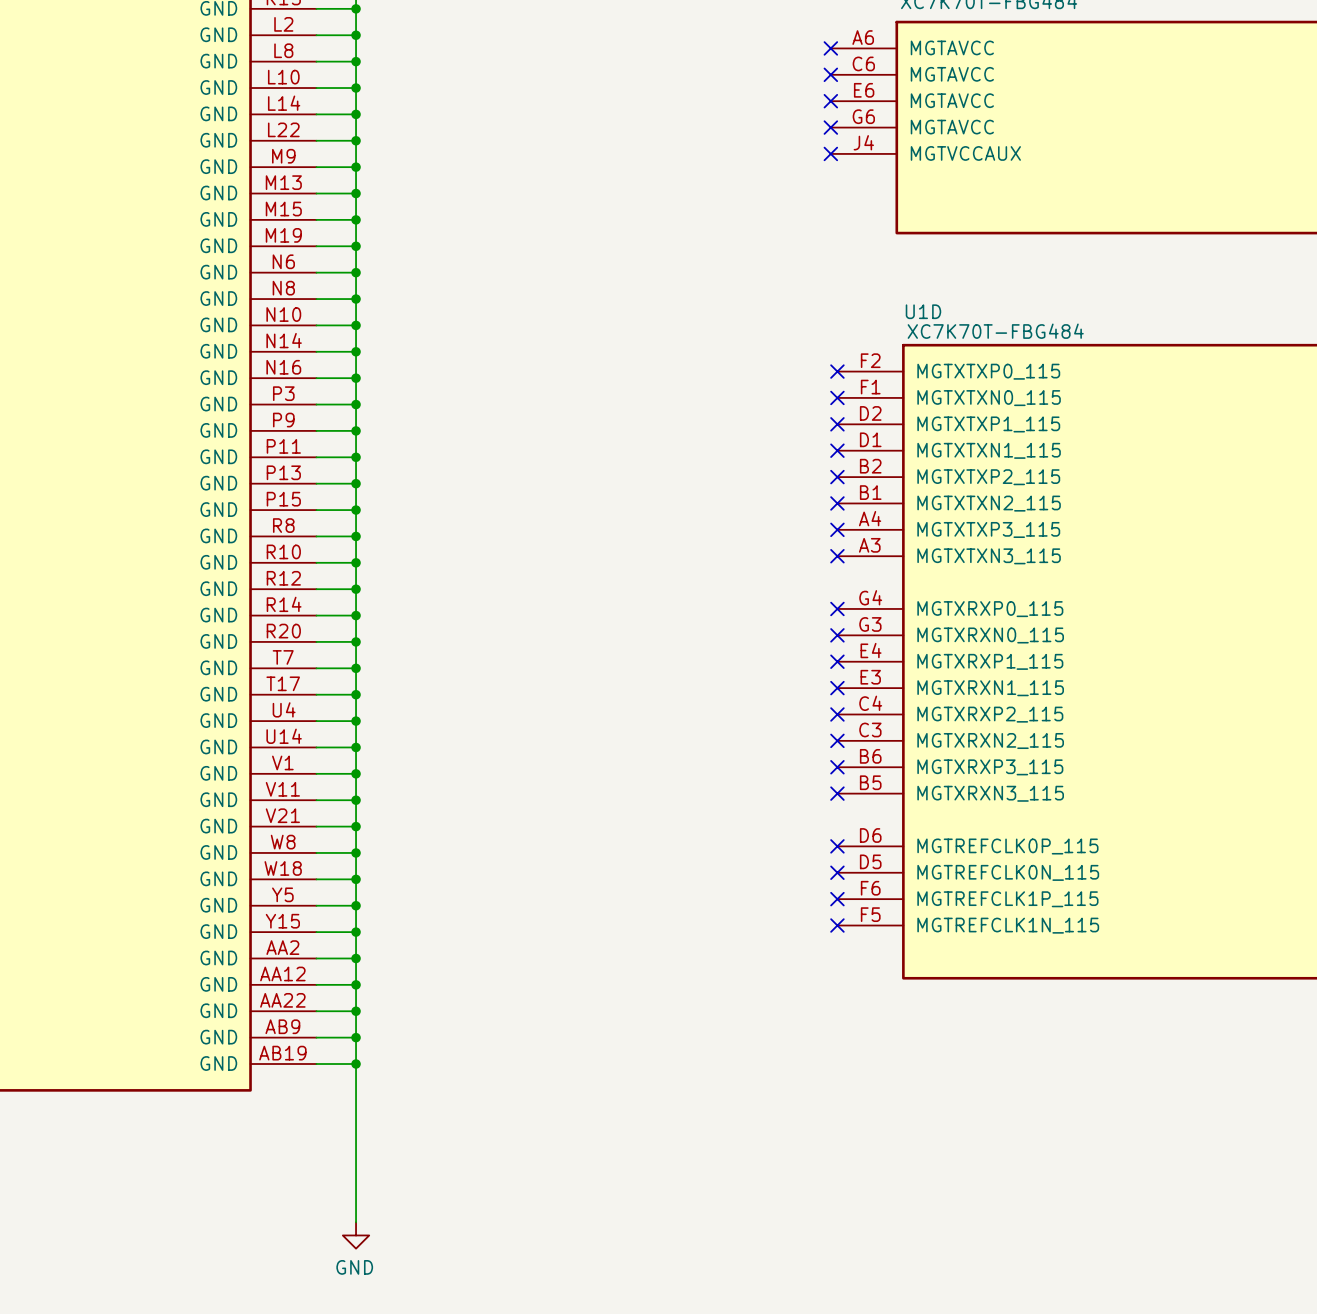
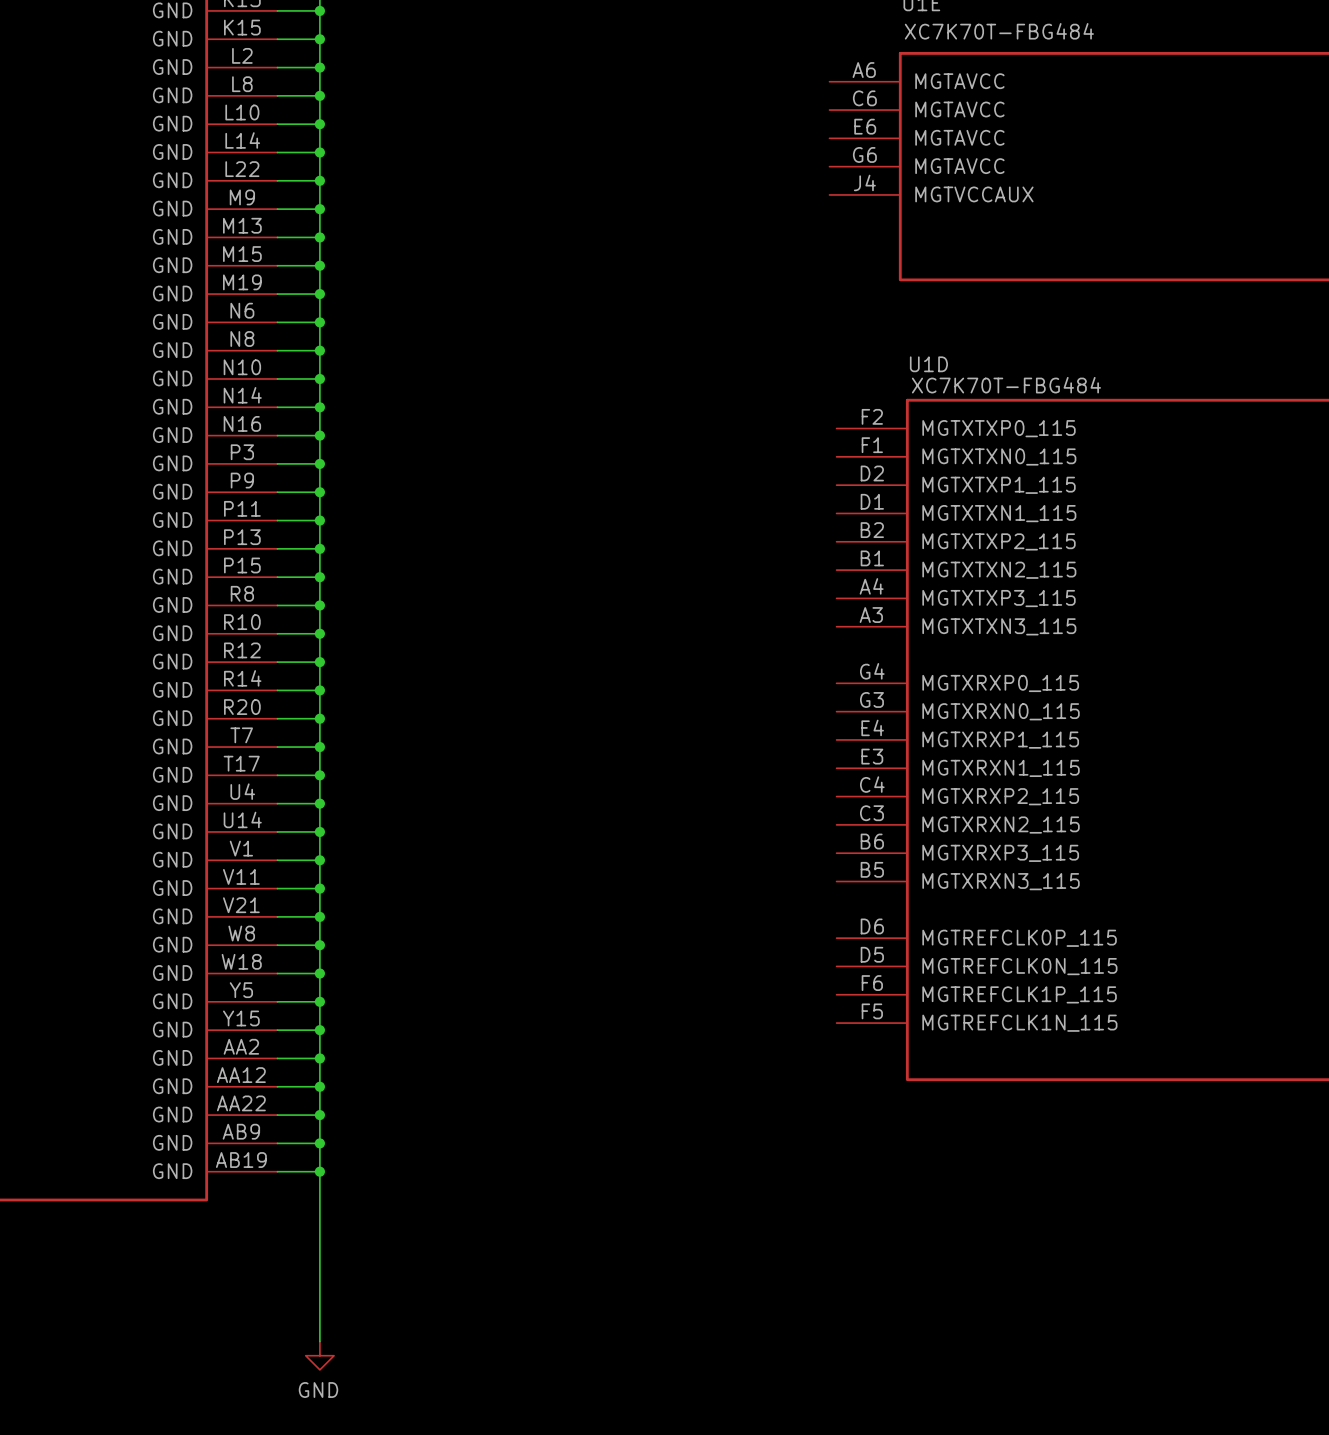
no-connect mark: (830, 48) -> none
no-connect mark: (830, 74) -> none
no-connect mark: (830, 101) -> none
no-connect mark: (830, 127) -> none
no-connect mark: (830, 153) -> none
no-connect mark: (837, 371) -> none
no-connect mark: (837, 397) -> none
no-connect mark: (837, 424) -> none
no-connect mark: (837, 450) -> none
no-connect mark: (837, 477) -> none
no-connect mark: (837, 503) -> none
no-connect mark: (837, 529) -> none
no-connect mark: (837, 556) -> none
no-connect mark: (837, 608) -> none
no-connect mark: (837, 635) -> none
no-connect mark: (837, 661) -> none
no-connect mark: (837, 688) -> none
no-connect mark: (837, 714) -> none
no-connect mark: (837, 740) -> none
no-connect mark: (837, 767) -> none
no-connect mark: (837, 793) -> none
no-connect mark: (837, 846) -> none
no-connect mark: (837, 872) -> none
no-connect mark: (837, 899) -> none
no-connect mark: (837, 925) -> none

